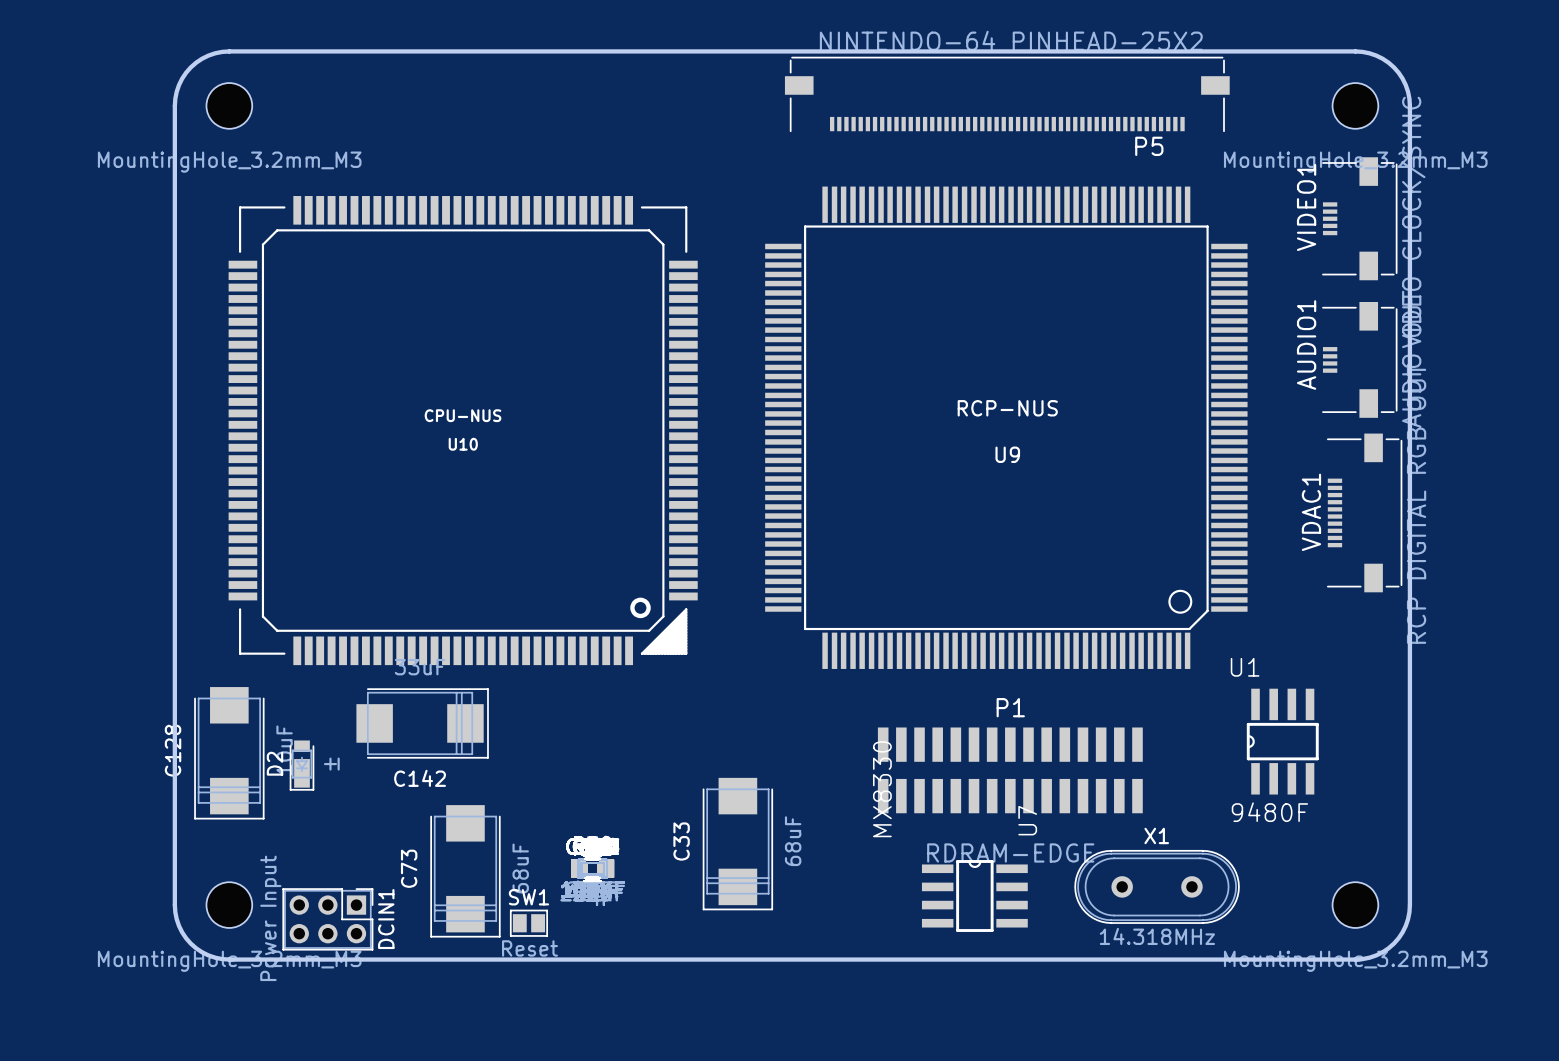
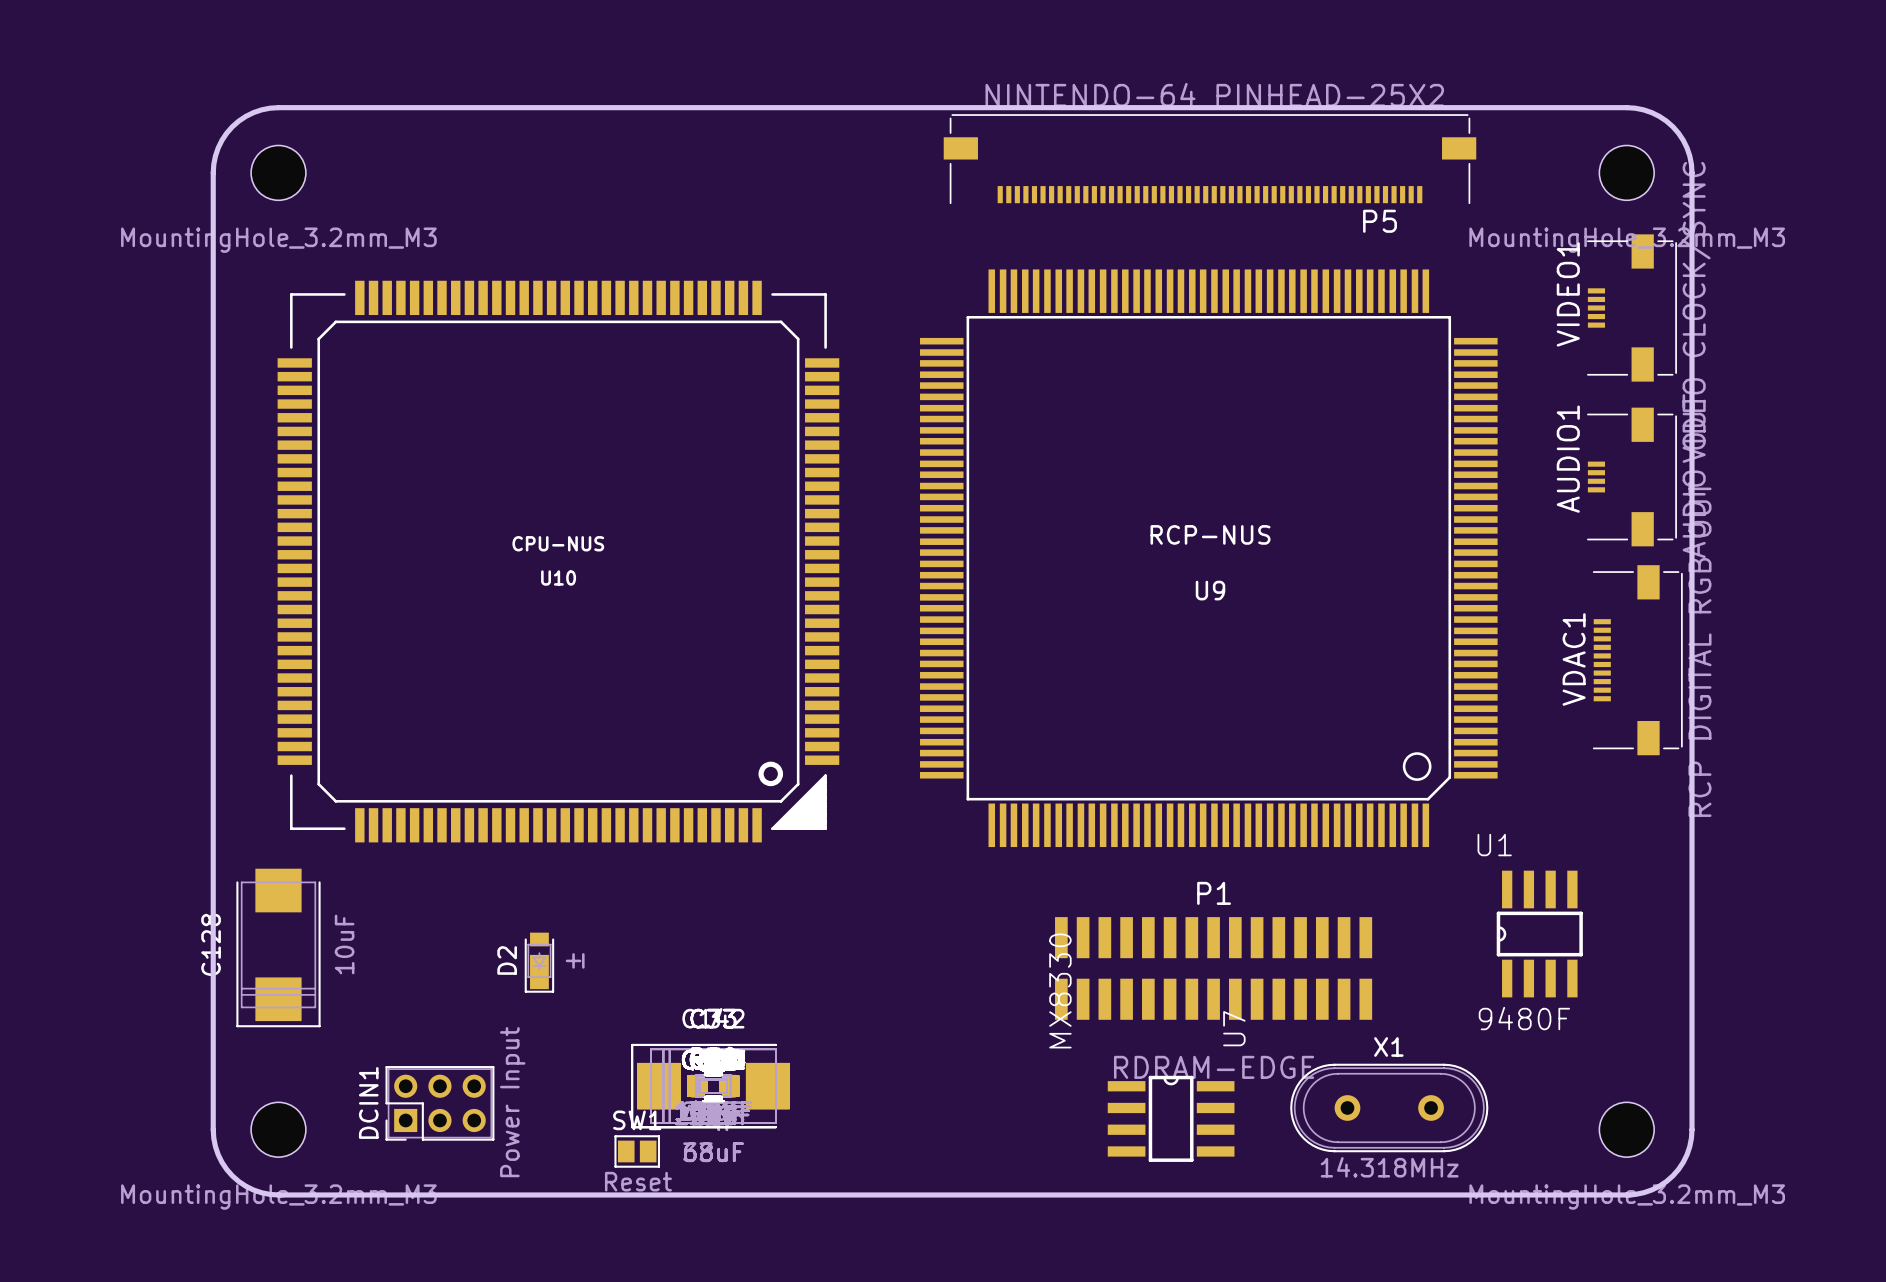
C142 rotation: 0° (422, 723) -> 180° (710, 1086)
C142 position: (422, 723) -> (710, 1086)
D2 position: (301, 765) -> (539, 962)
C33 rotation: 0° (737, 844) -> 90° clockwise (710, 1086)
C33 position: (737, 844) -> (710, 1086)
C73 rotation: 0° (465, 871) -> 90° clockwise (710, 1086)
C73 position: (465, 871) -> (710, 1086)
DCIN1 rotation: 0° (327, 919) -> 180° (439, 1103)

